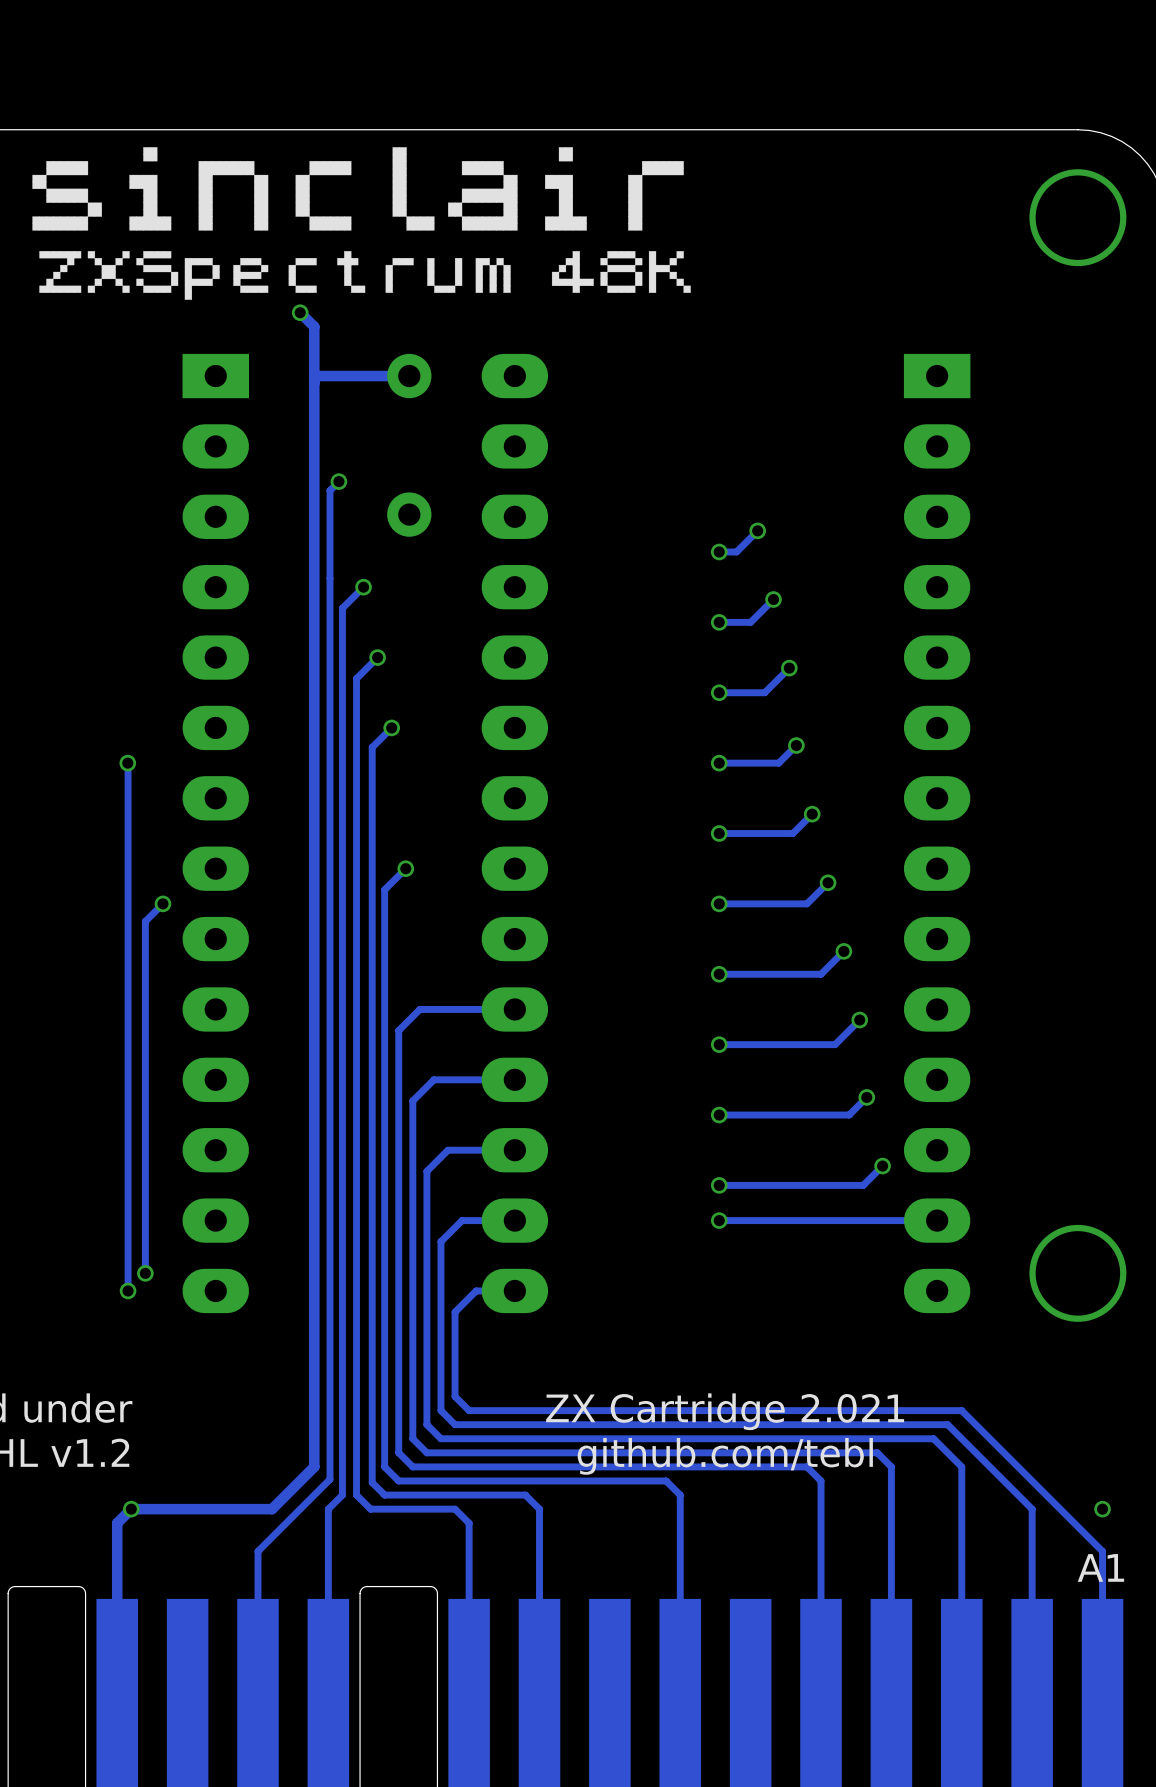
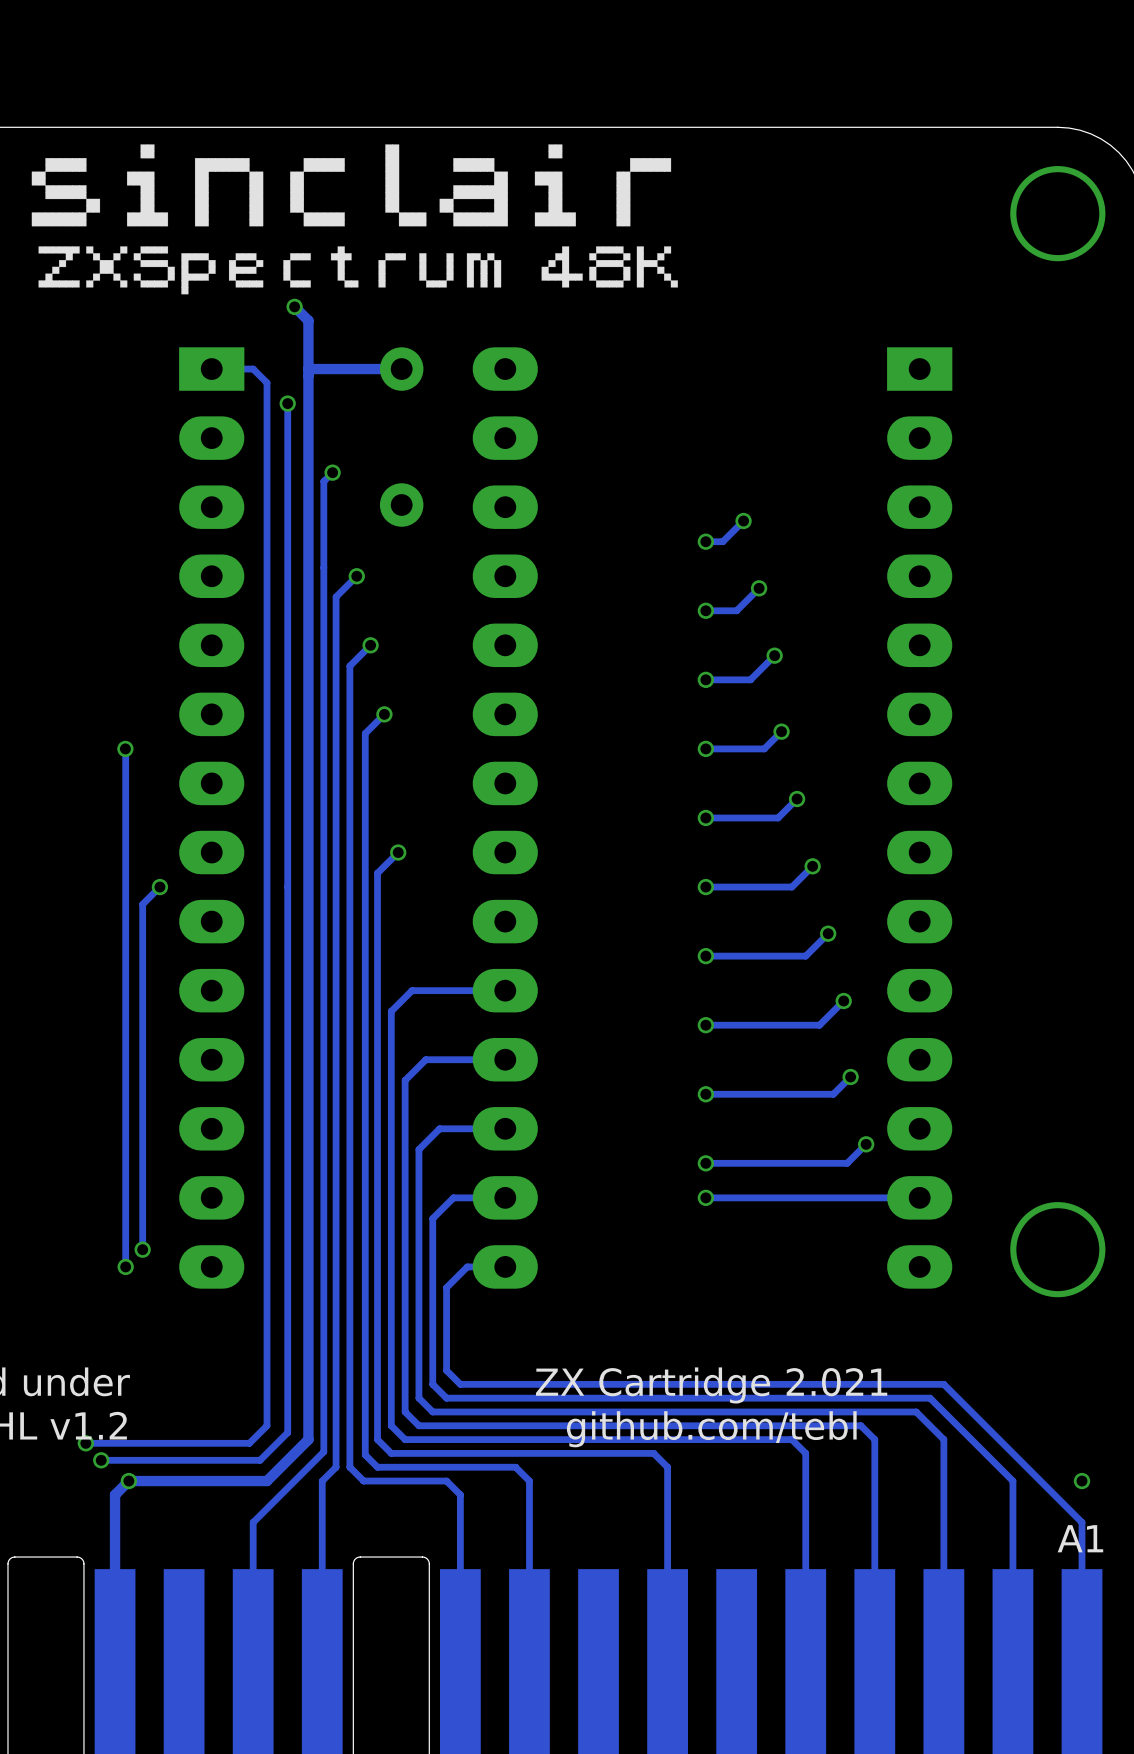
track: none -> (211, 369) (253, 369) (267, 382) (267, 1425) (249, 1443) (85, 1443)
track: none -> (287, 403) (287, 1432) (260, 1460) (101, 1460)
via: none -> (287, 403)
via: none -> (85, 1443)
via: none -> (101, 1460)

